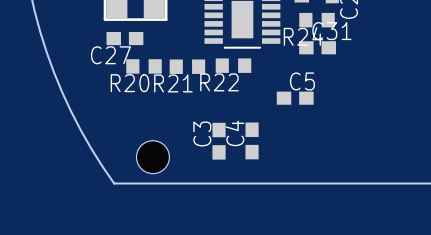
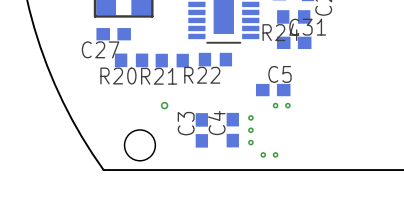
via: none -> (164, 105)
via: none -> (275, 105)
via: none -> (287, 105)
via: none -> (250, 117)
via: none -> (250, 130)
via: none -> (250, 142)
via: none -> (263, 154)
via: none -> (275, 154)

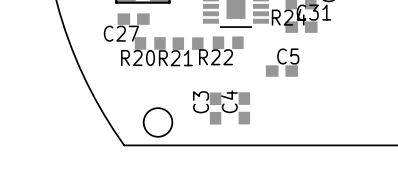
via: (164, 105) -> none
via: (275, 105) -> none
via: (287, 105) -> none
via: (250, 117) -> none
via: (250, 130) -> none
via: (250, 142) -> none
via: (263, 154) -> none
via: (275, 154) -> none

